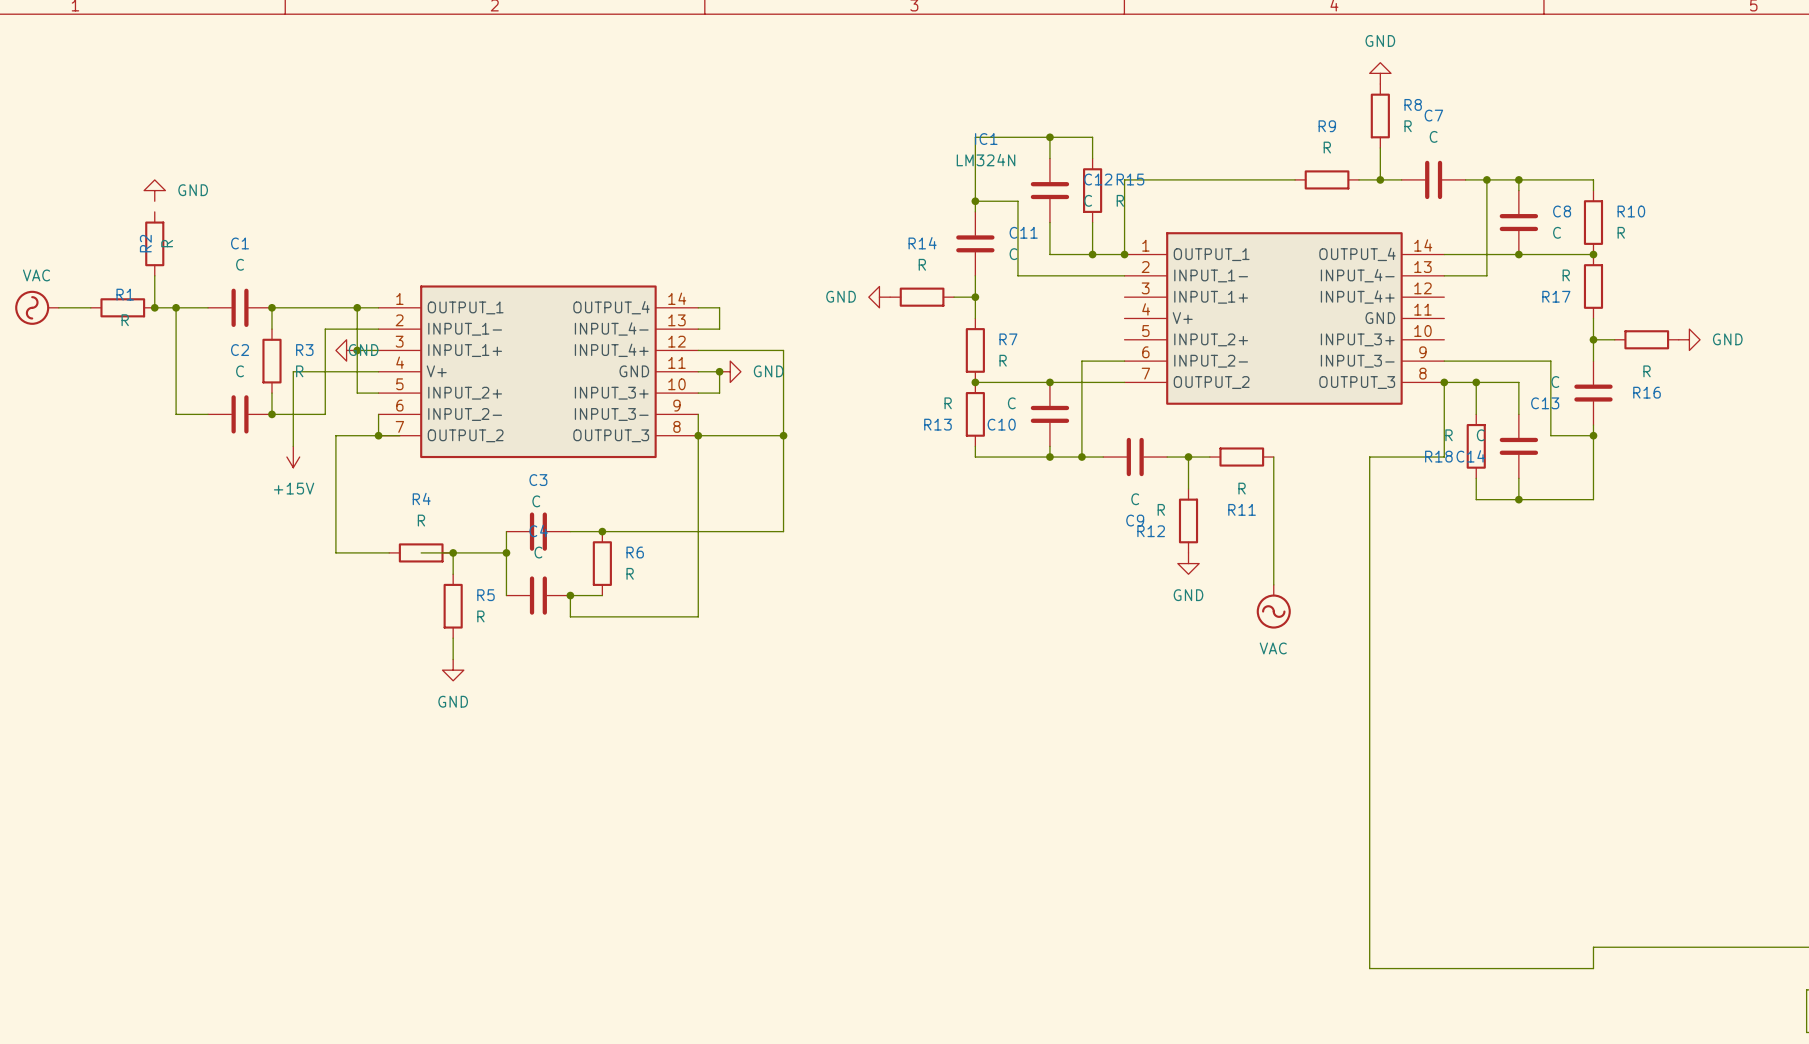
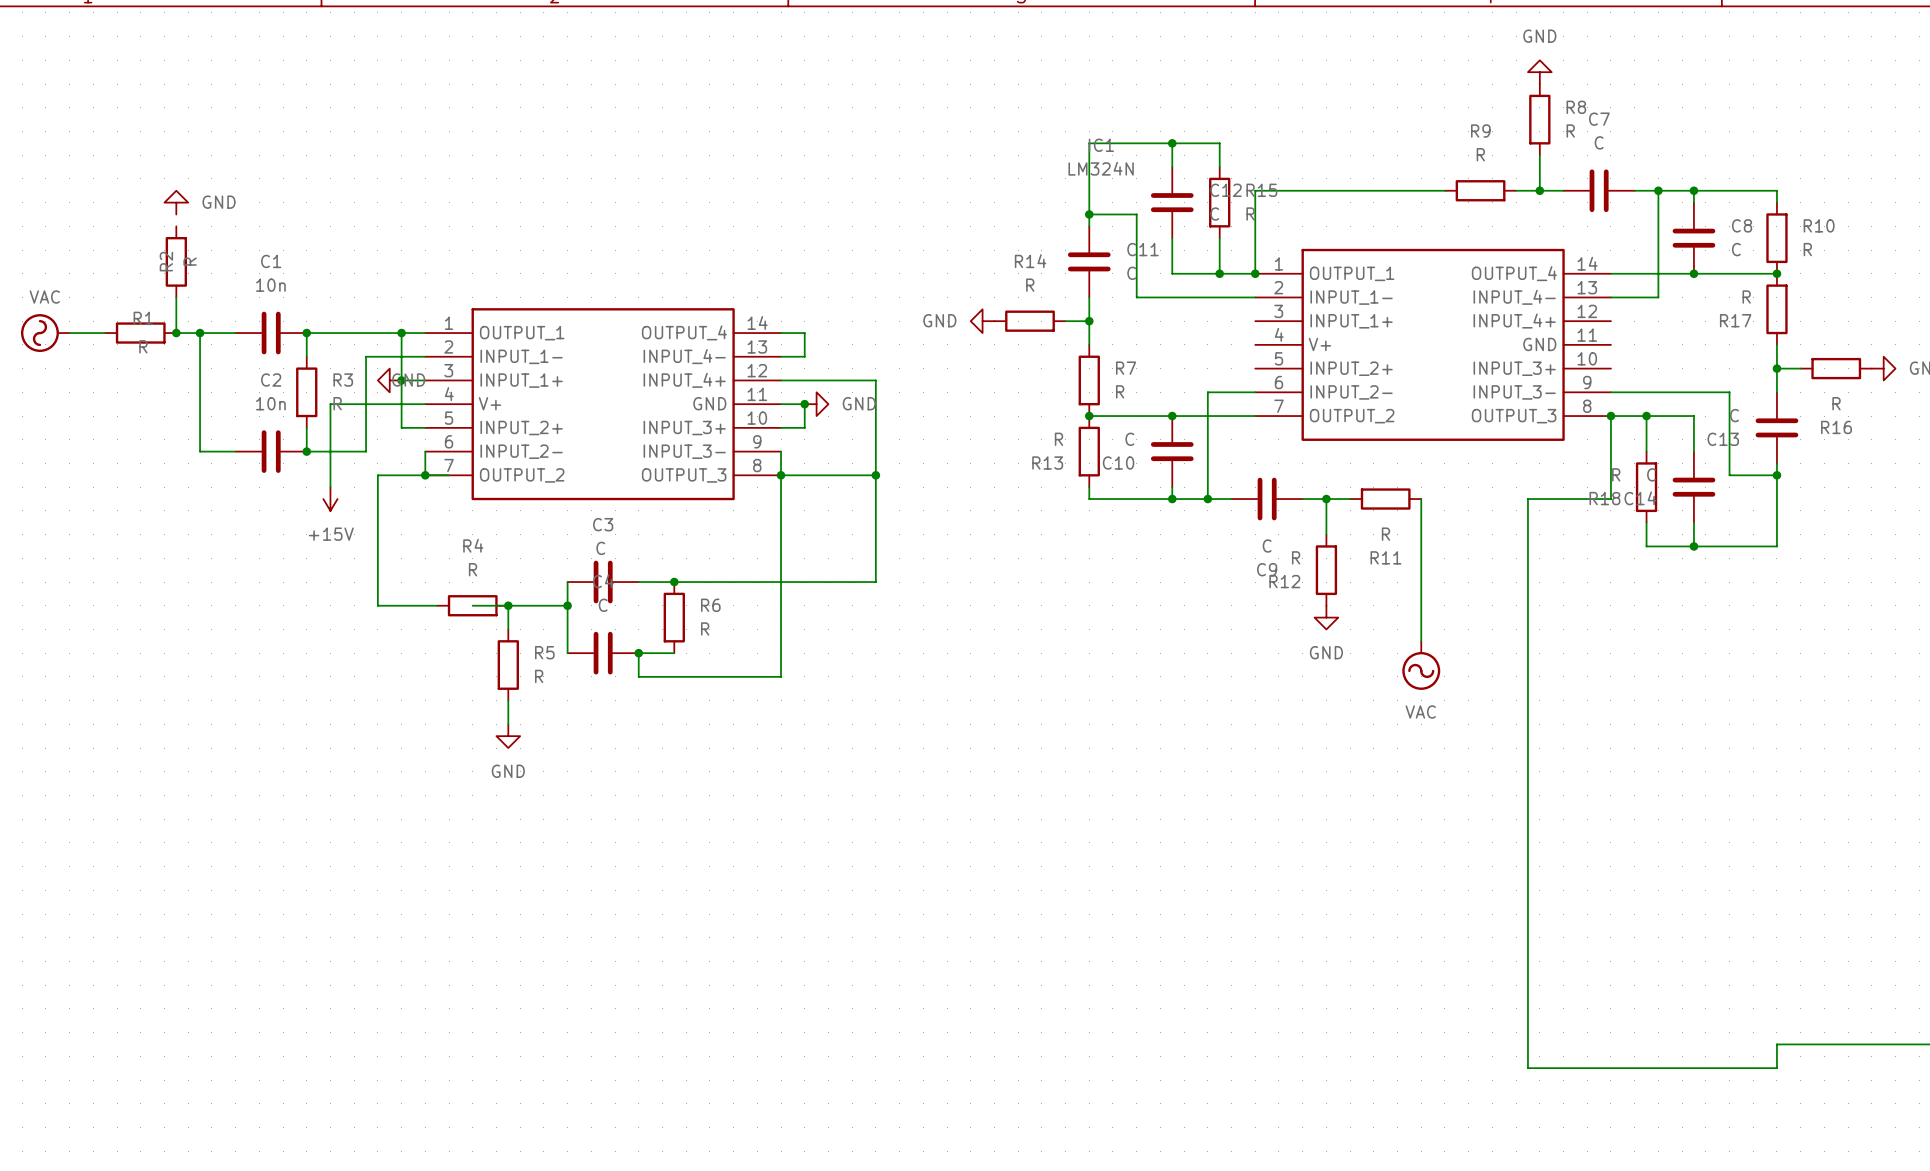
C1 value: C (240, 264) -> 10n (270, 285)
C2 value: C (240, 371) -> 10n (270, 403)

